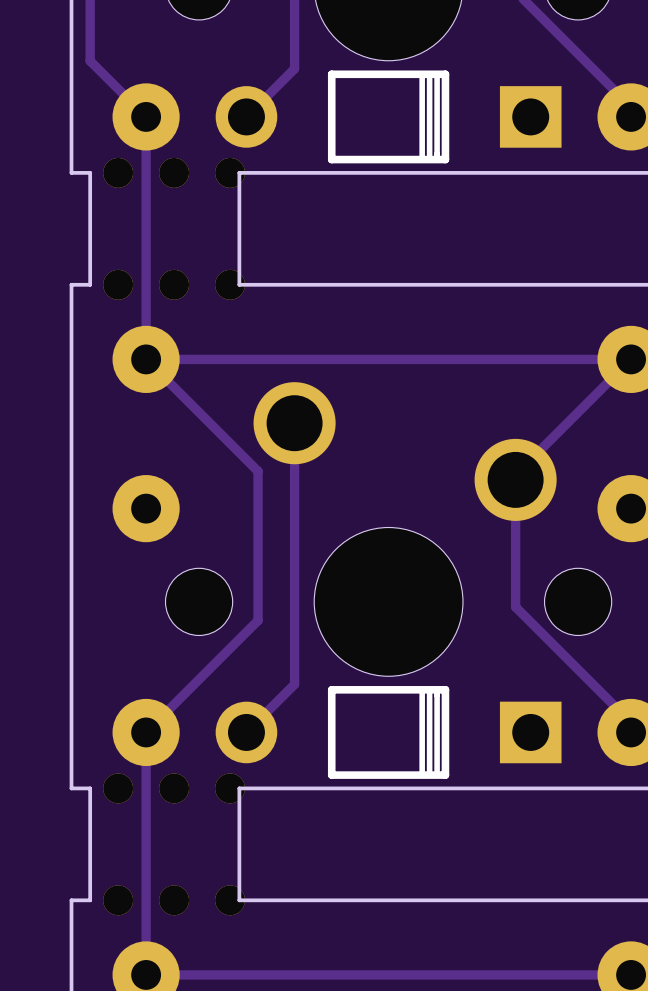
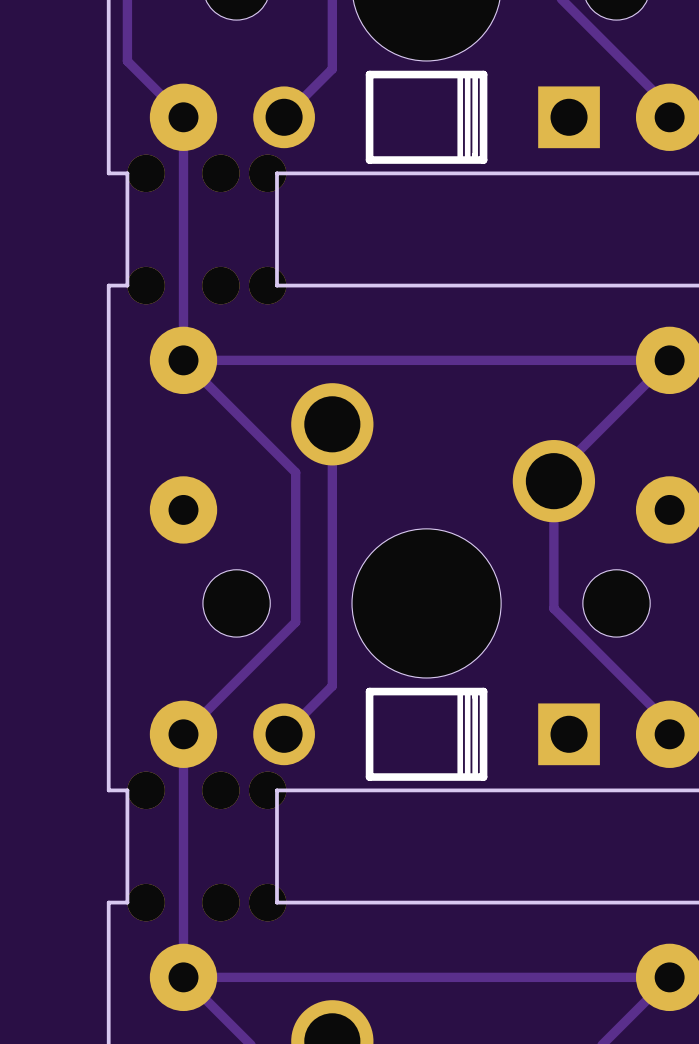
part footprint: [103, 157, 245, 188] -> [127, 154, 287, 193]
part footprint: [103, 269, 245, 300] -> [127, 266, 287, 305]
part footprint: [103, 773, 245, 804] -> [127, 771, 287, 810]
part footprint: [103, 885, 245, 916] -> [127, 883, 287, 922]

